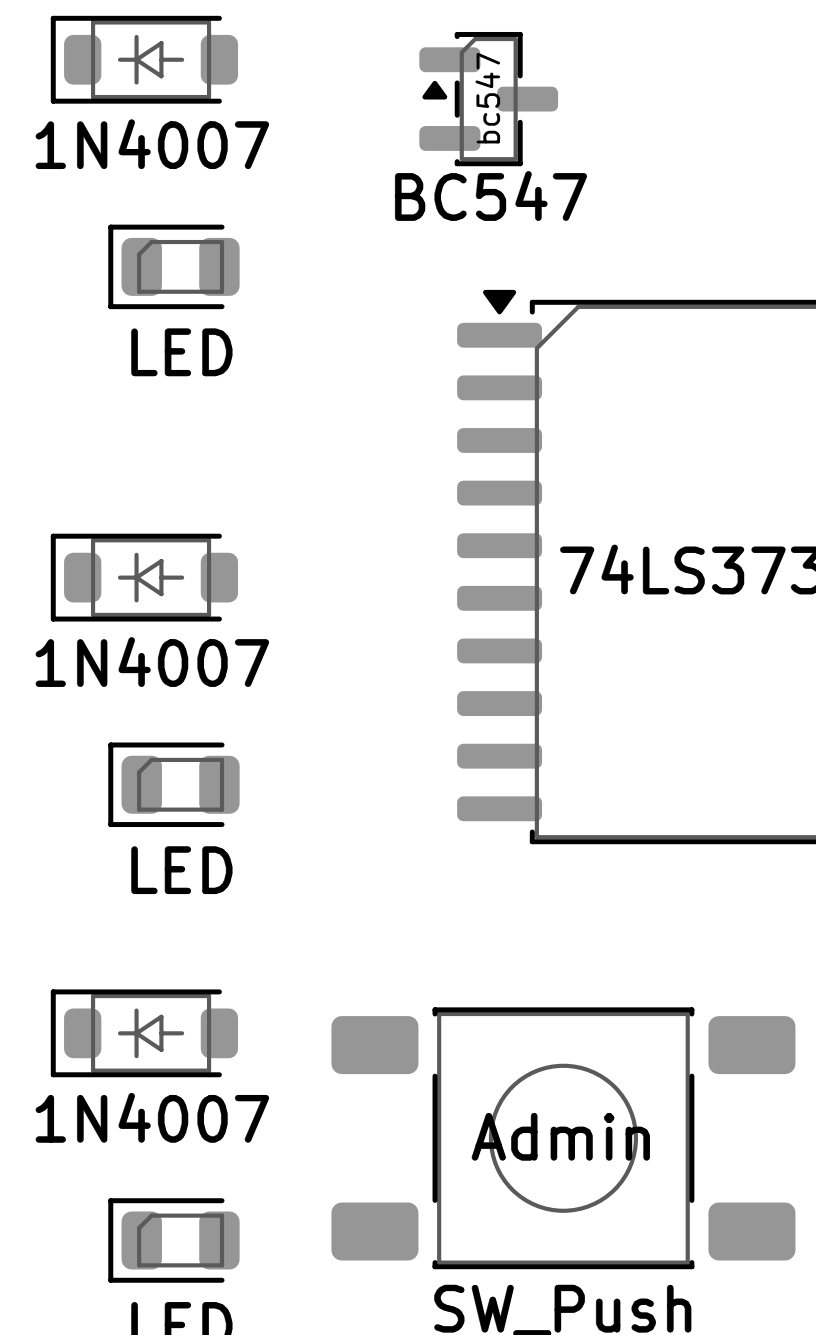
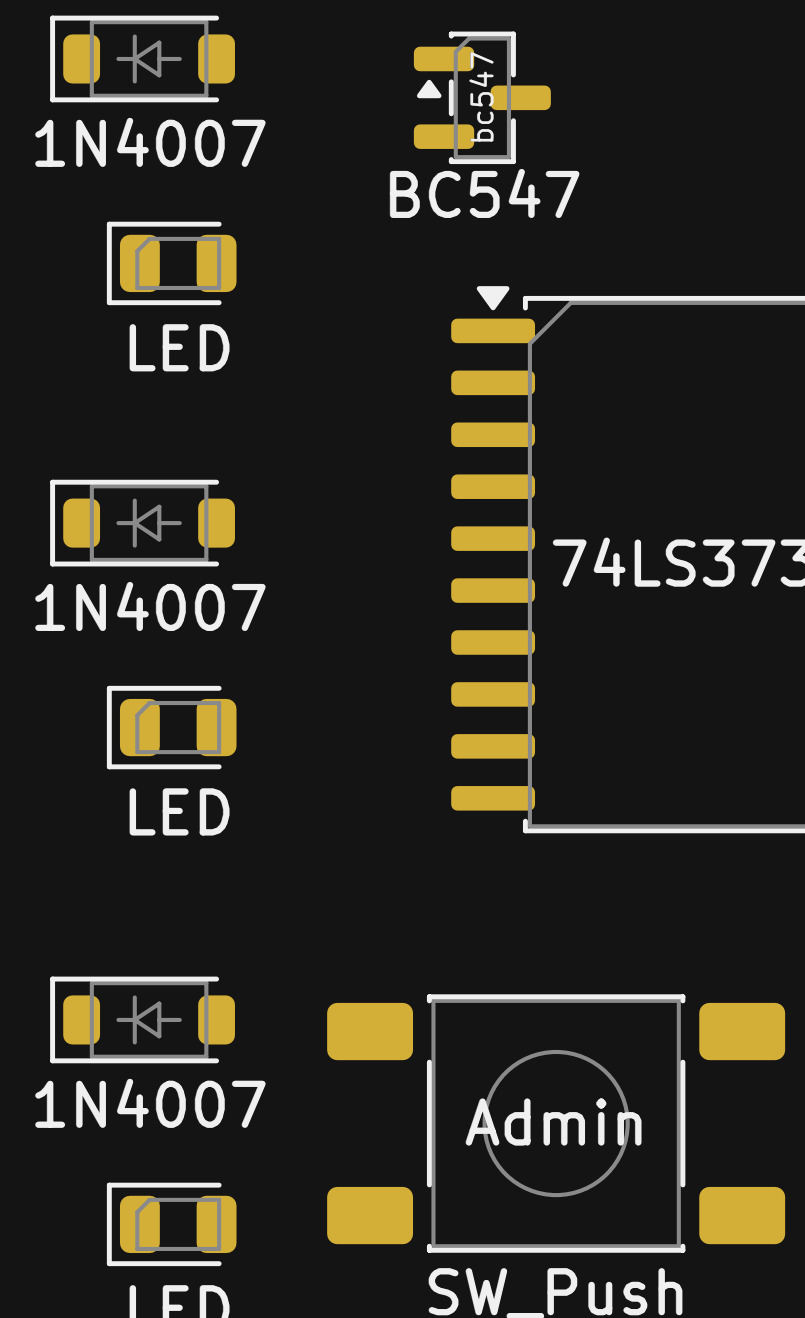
part position: (144, 577) -> (142, 523)
text position: 1N4007 (152, 662) -> 1N4007 (150, 606)
part position: (173, 784) -> (171, 727)
text position: LED (182, 870) -> LED (179, 811)

